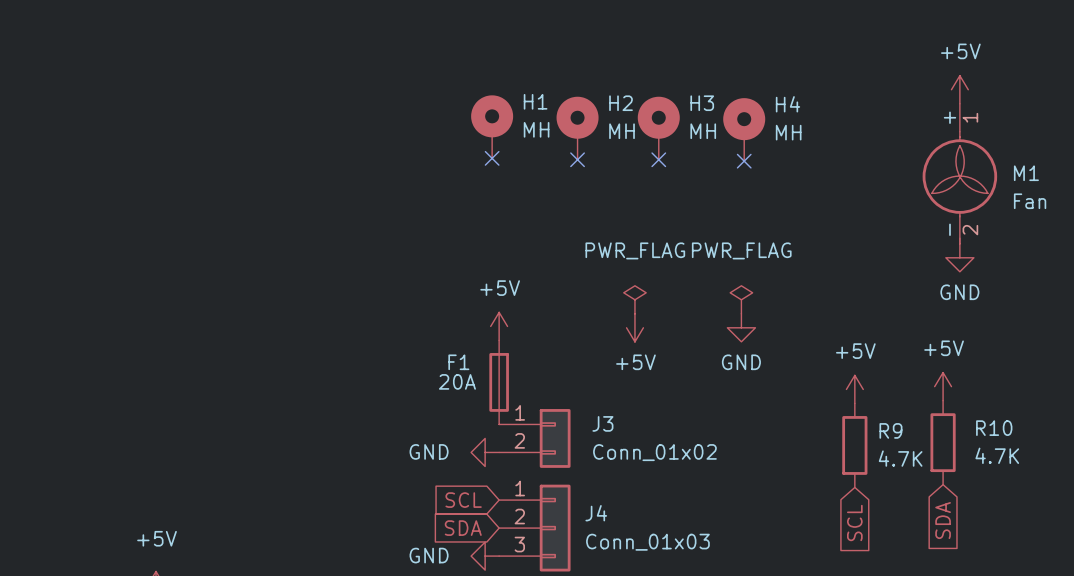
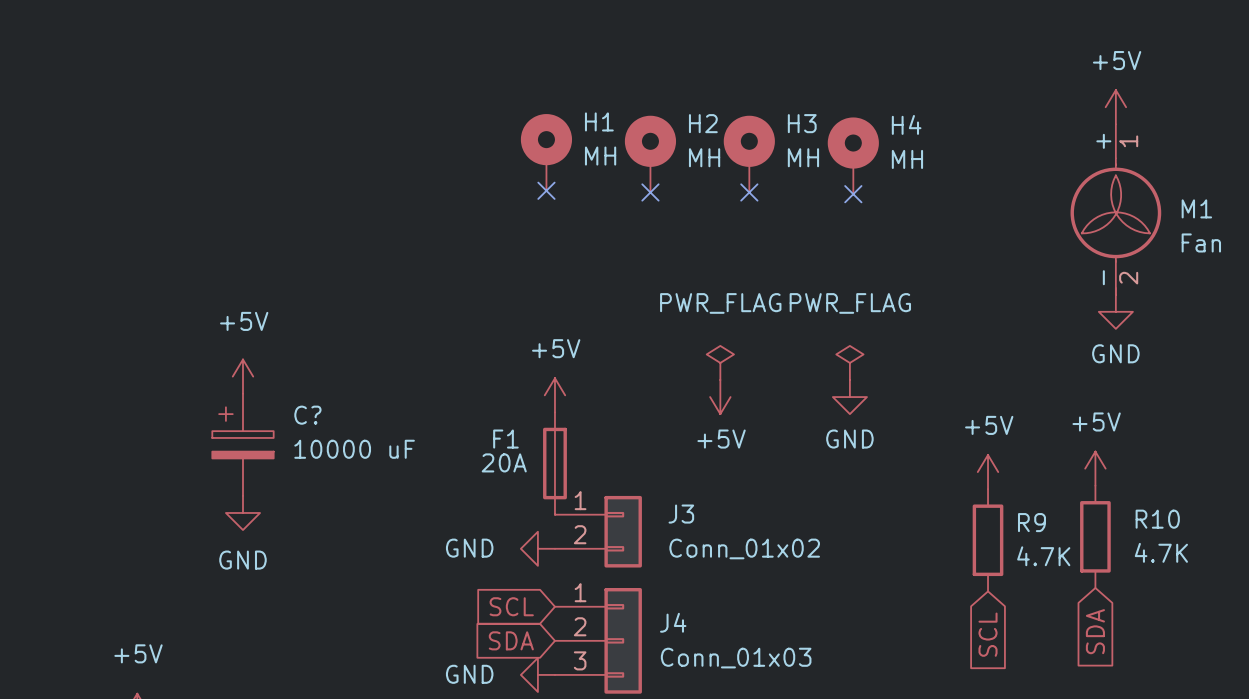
power symbol: none -> +5V (242, 376)
C?: none -> 10000 uF (242, 444)
power symbol: none -> GND (242, 512)

